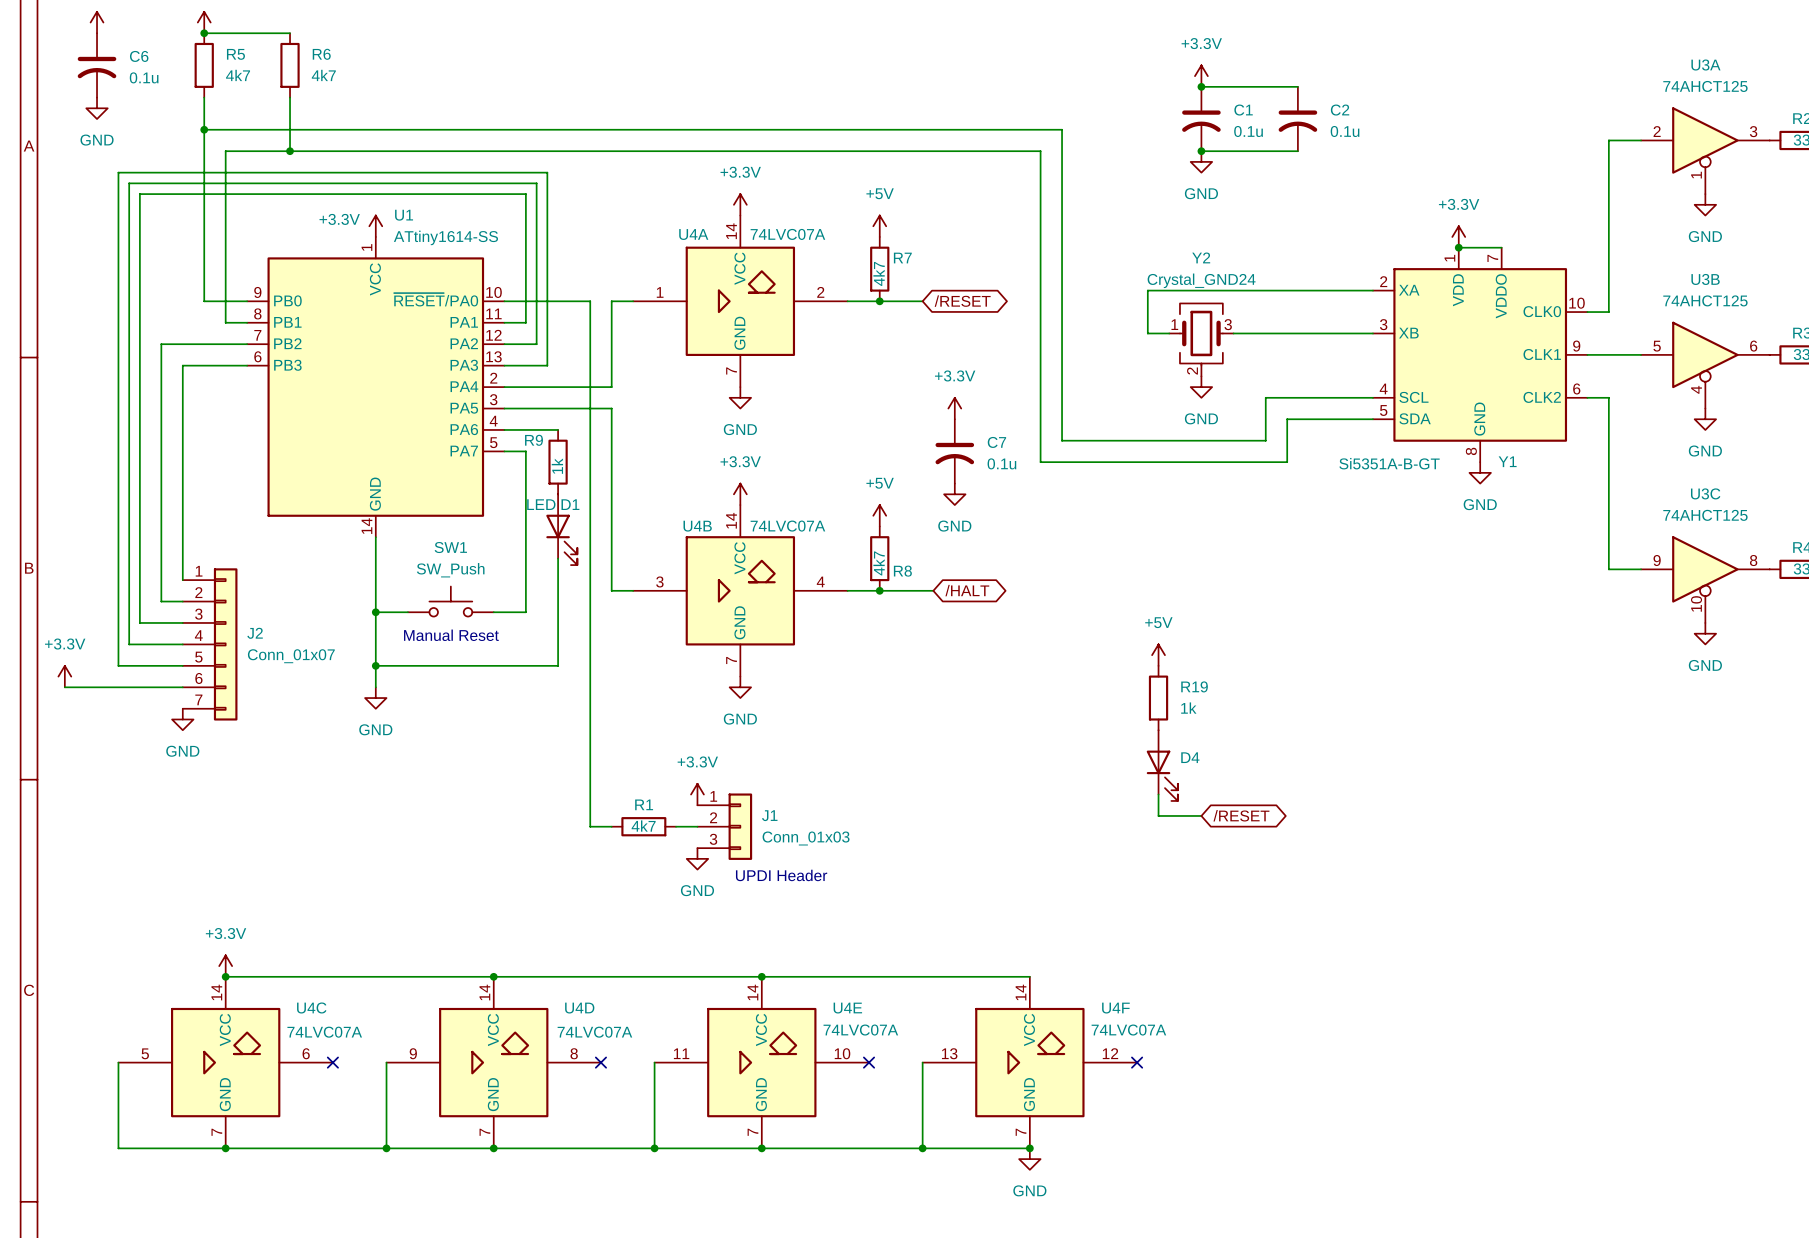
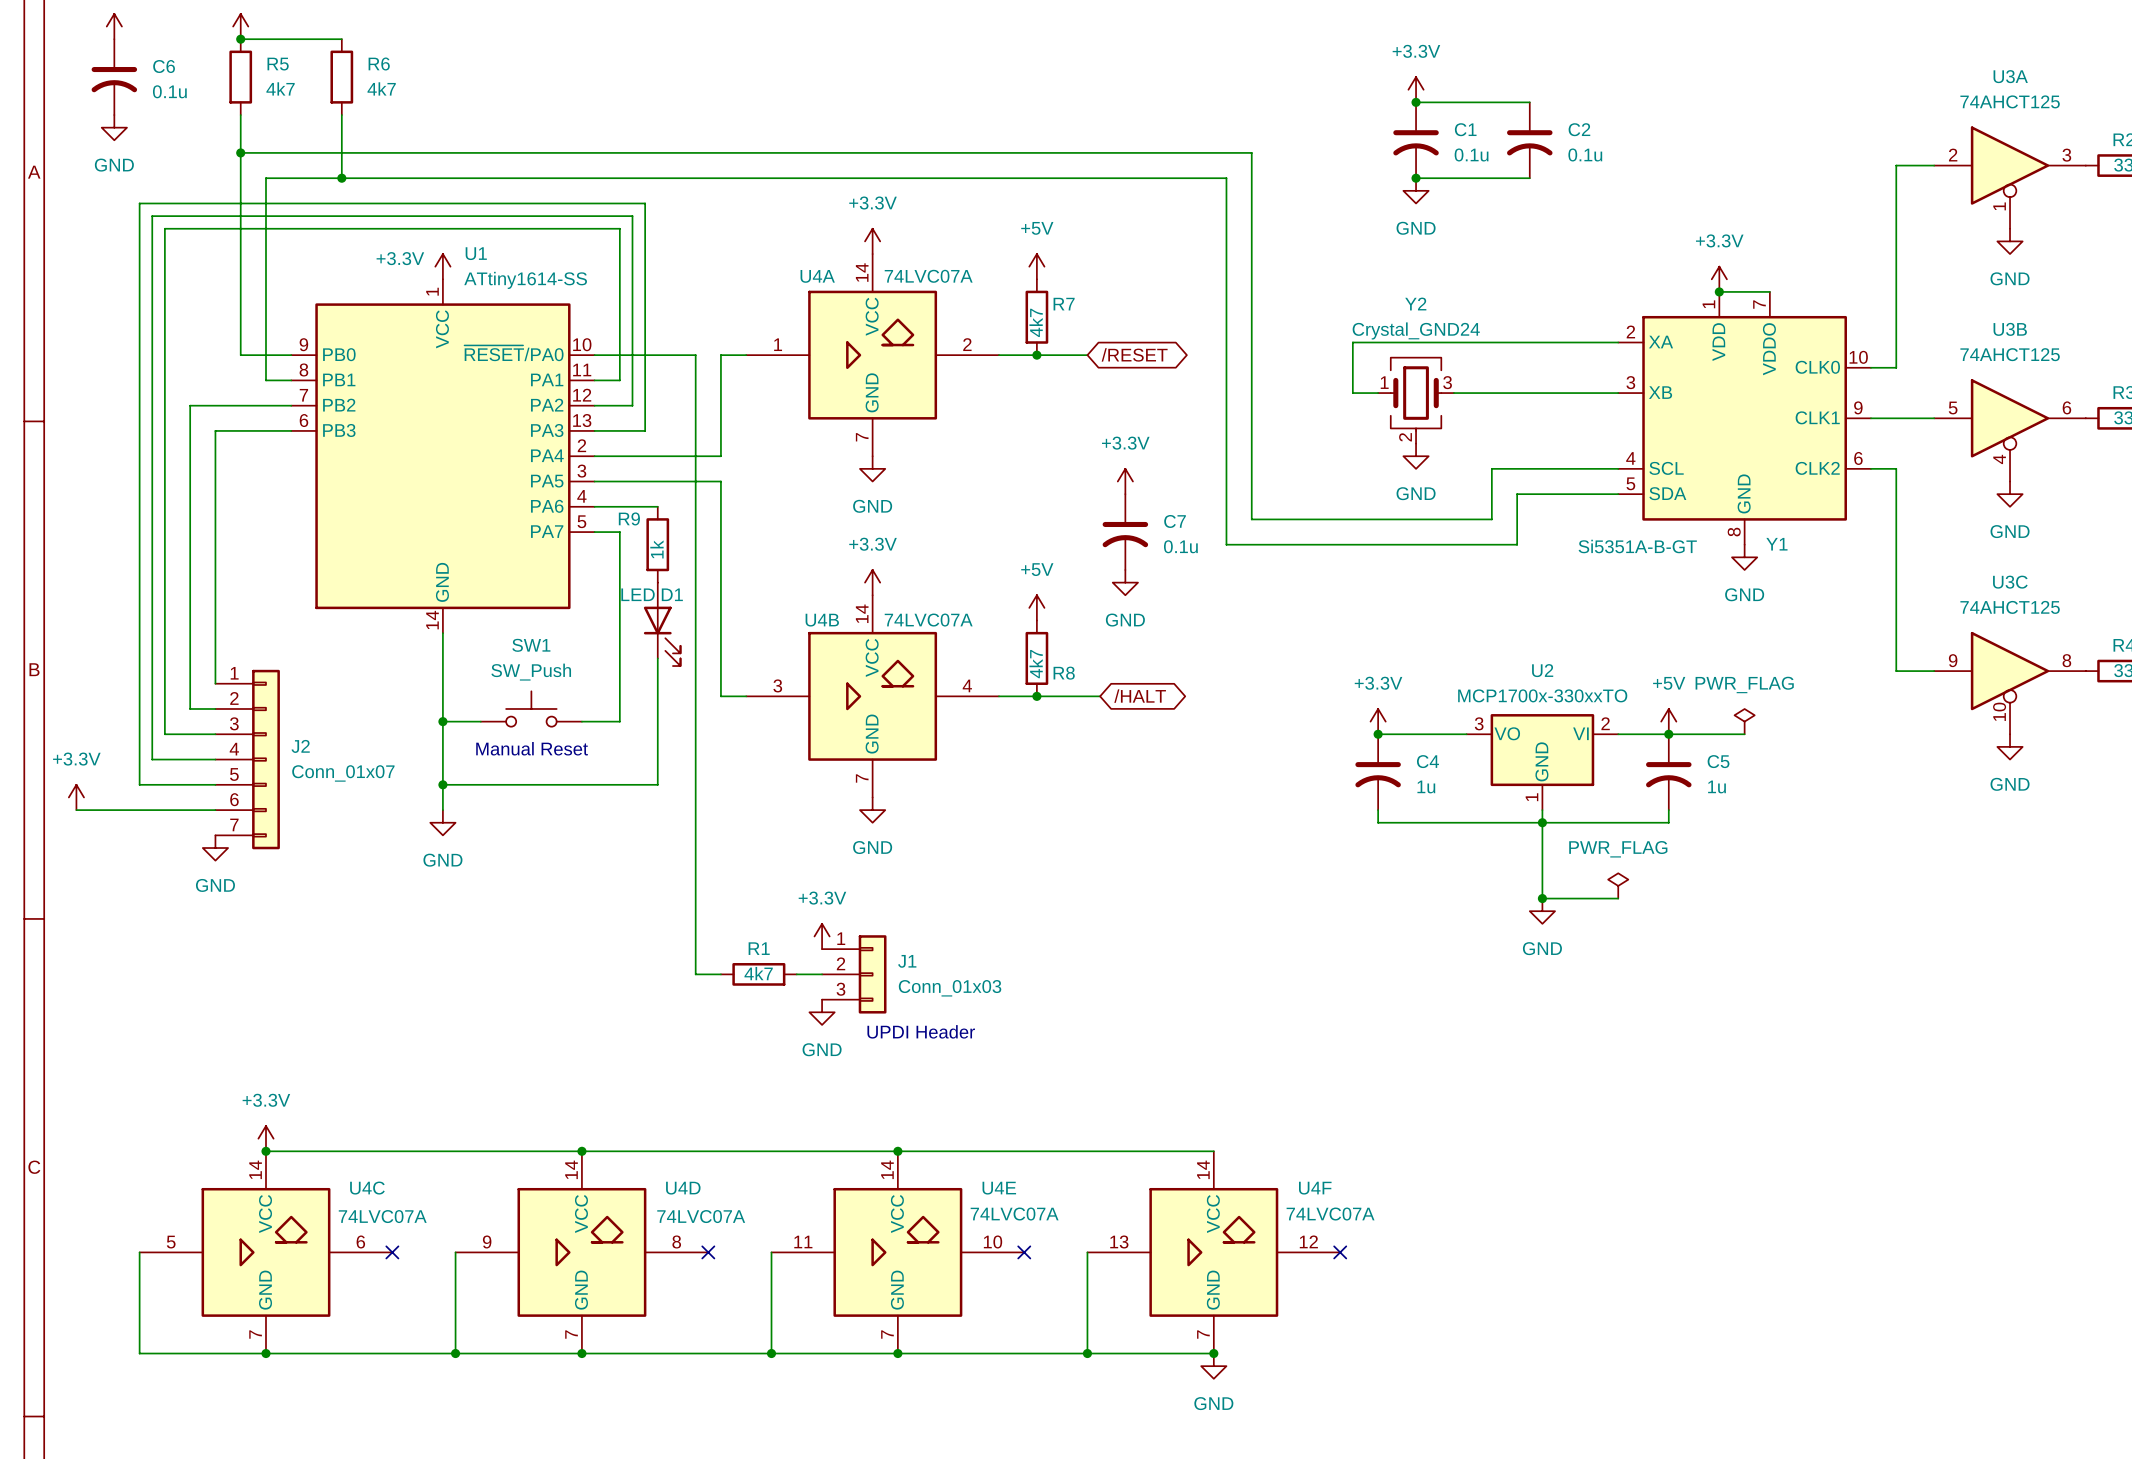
power symbol: none -> +3.3V (1378, 721)
power symbol: none -> +5V (1668, 721)
power symbol: none -> PWR_FLAG (1744, 721)
wire: none -> (1378, 734) (1466, 734)
junction: none -> (1378, 734)
wire: none -> (1618, 734) (1744, 734)
junction: none -> (1668, 734)
U2: none -> MCP1700x-330xxTO (1542, 762)
power symbol: +5V (1158, 655) -> none
C4: none -> 1u (1378, 772)
C5: none -> 1u (1668, 772)
wire: none -> (1378, 810) (1378, 822) (1668, 822) (1668, 810)
wire: none -> (1542, 810) (1542, 898) (1618, 898)
R19: 1k (1158, 698) -> none
junction: none -> (1542, 822)
power symbol: none -> PWR_FLAG (1618, 885)
junction: none -> (1542, 898)
D4: (1162, 765) -> none
power symbol: none -> GND (1542, 911)
wire: (1158, 794) (1158, 815) (1201, 815) -> none
global label: /RESET (1241, 815) -> none

